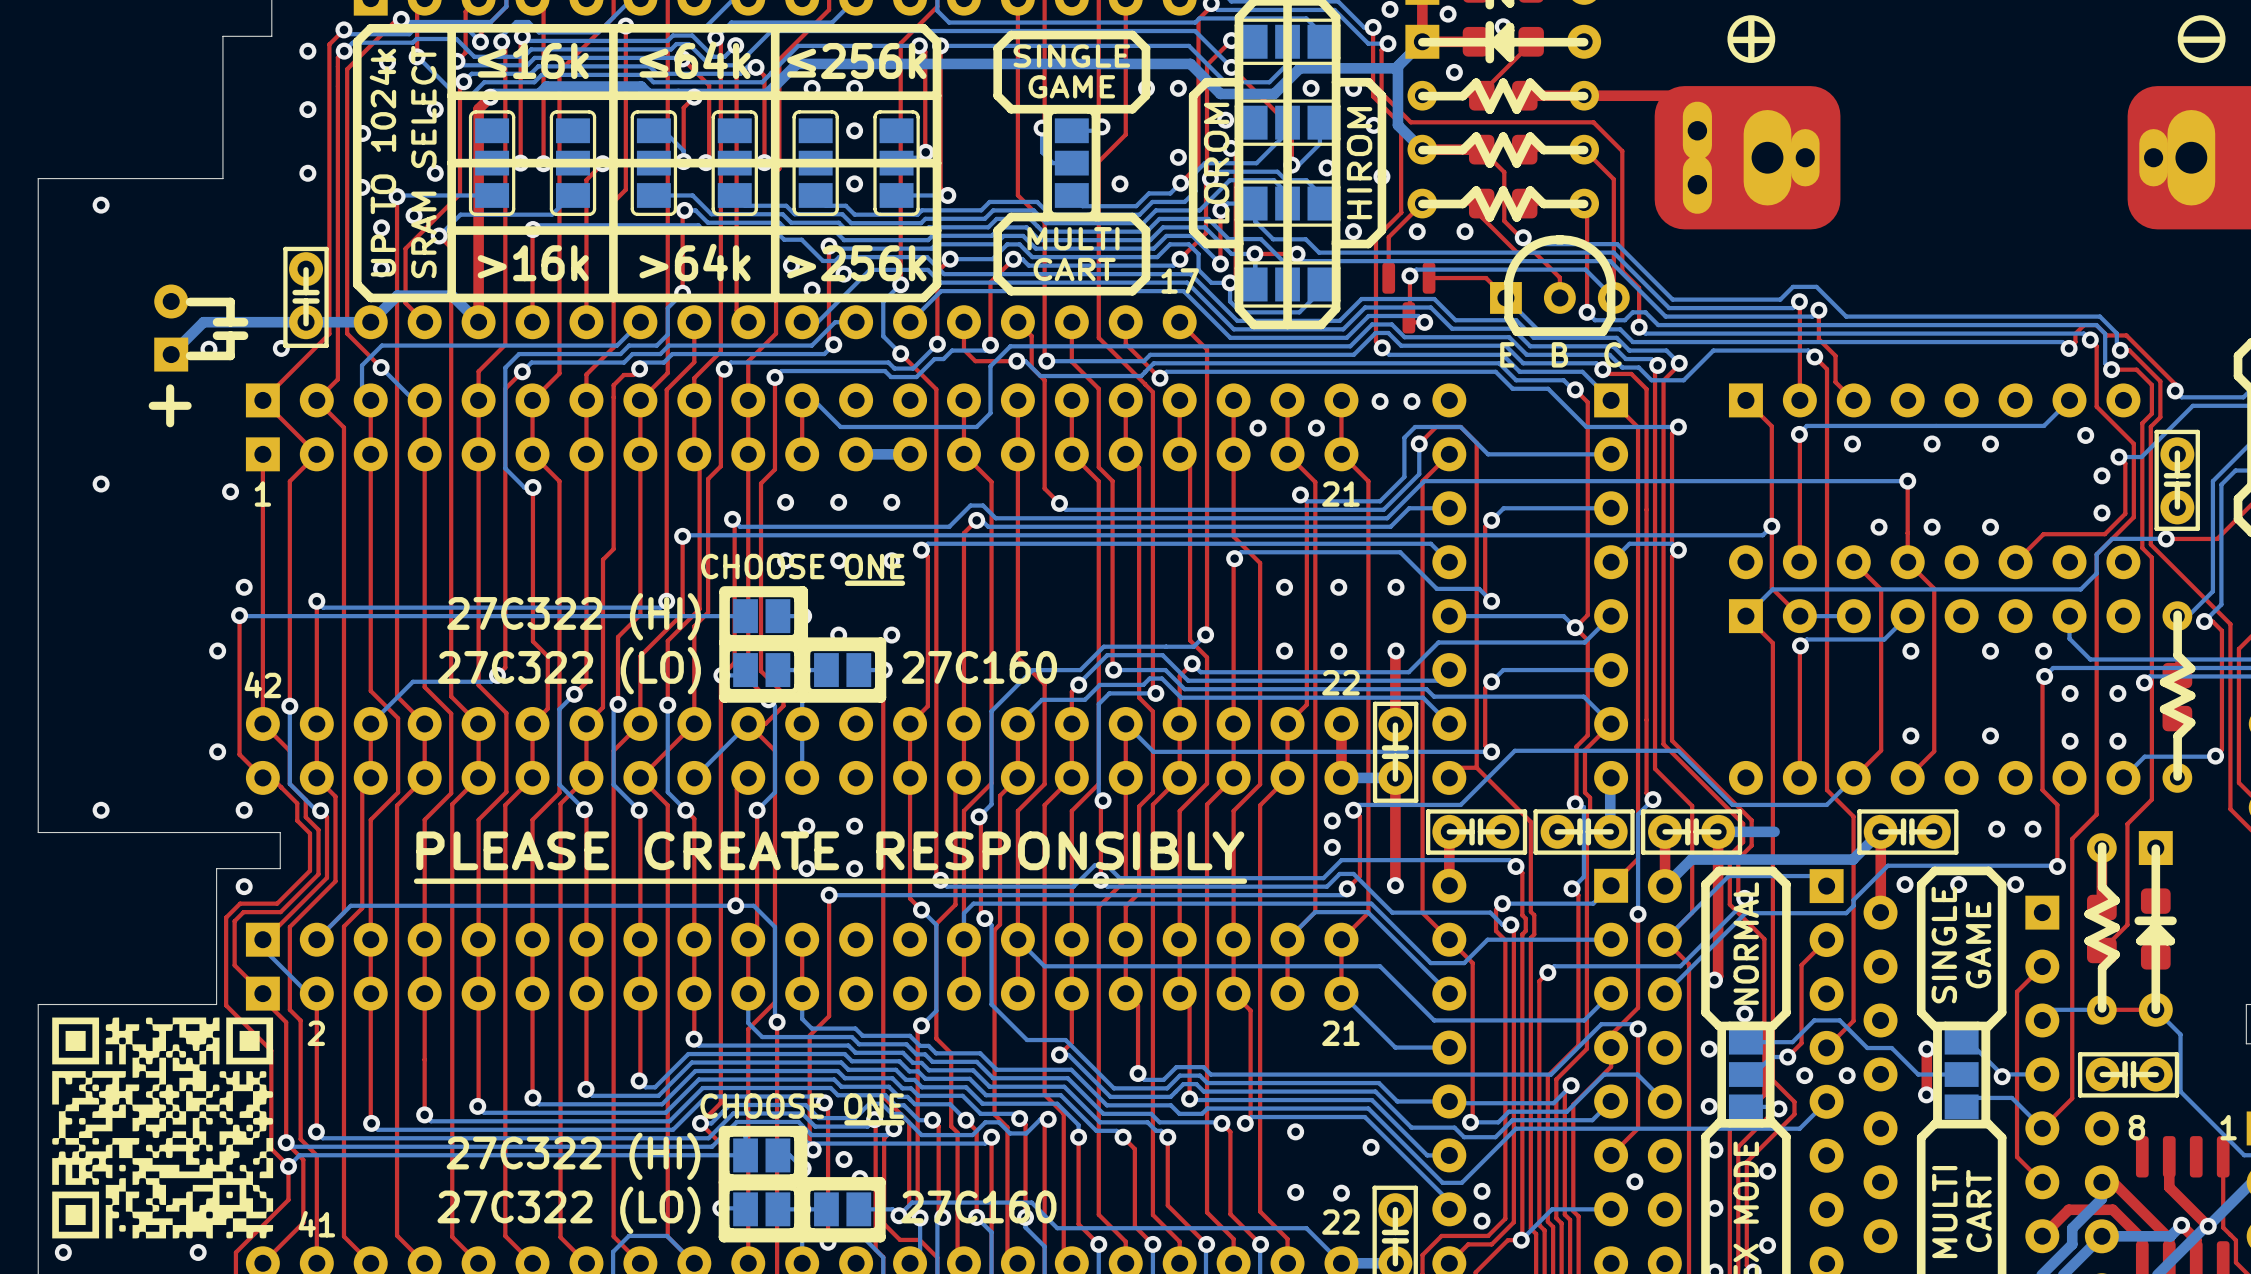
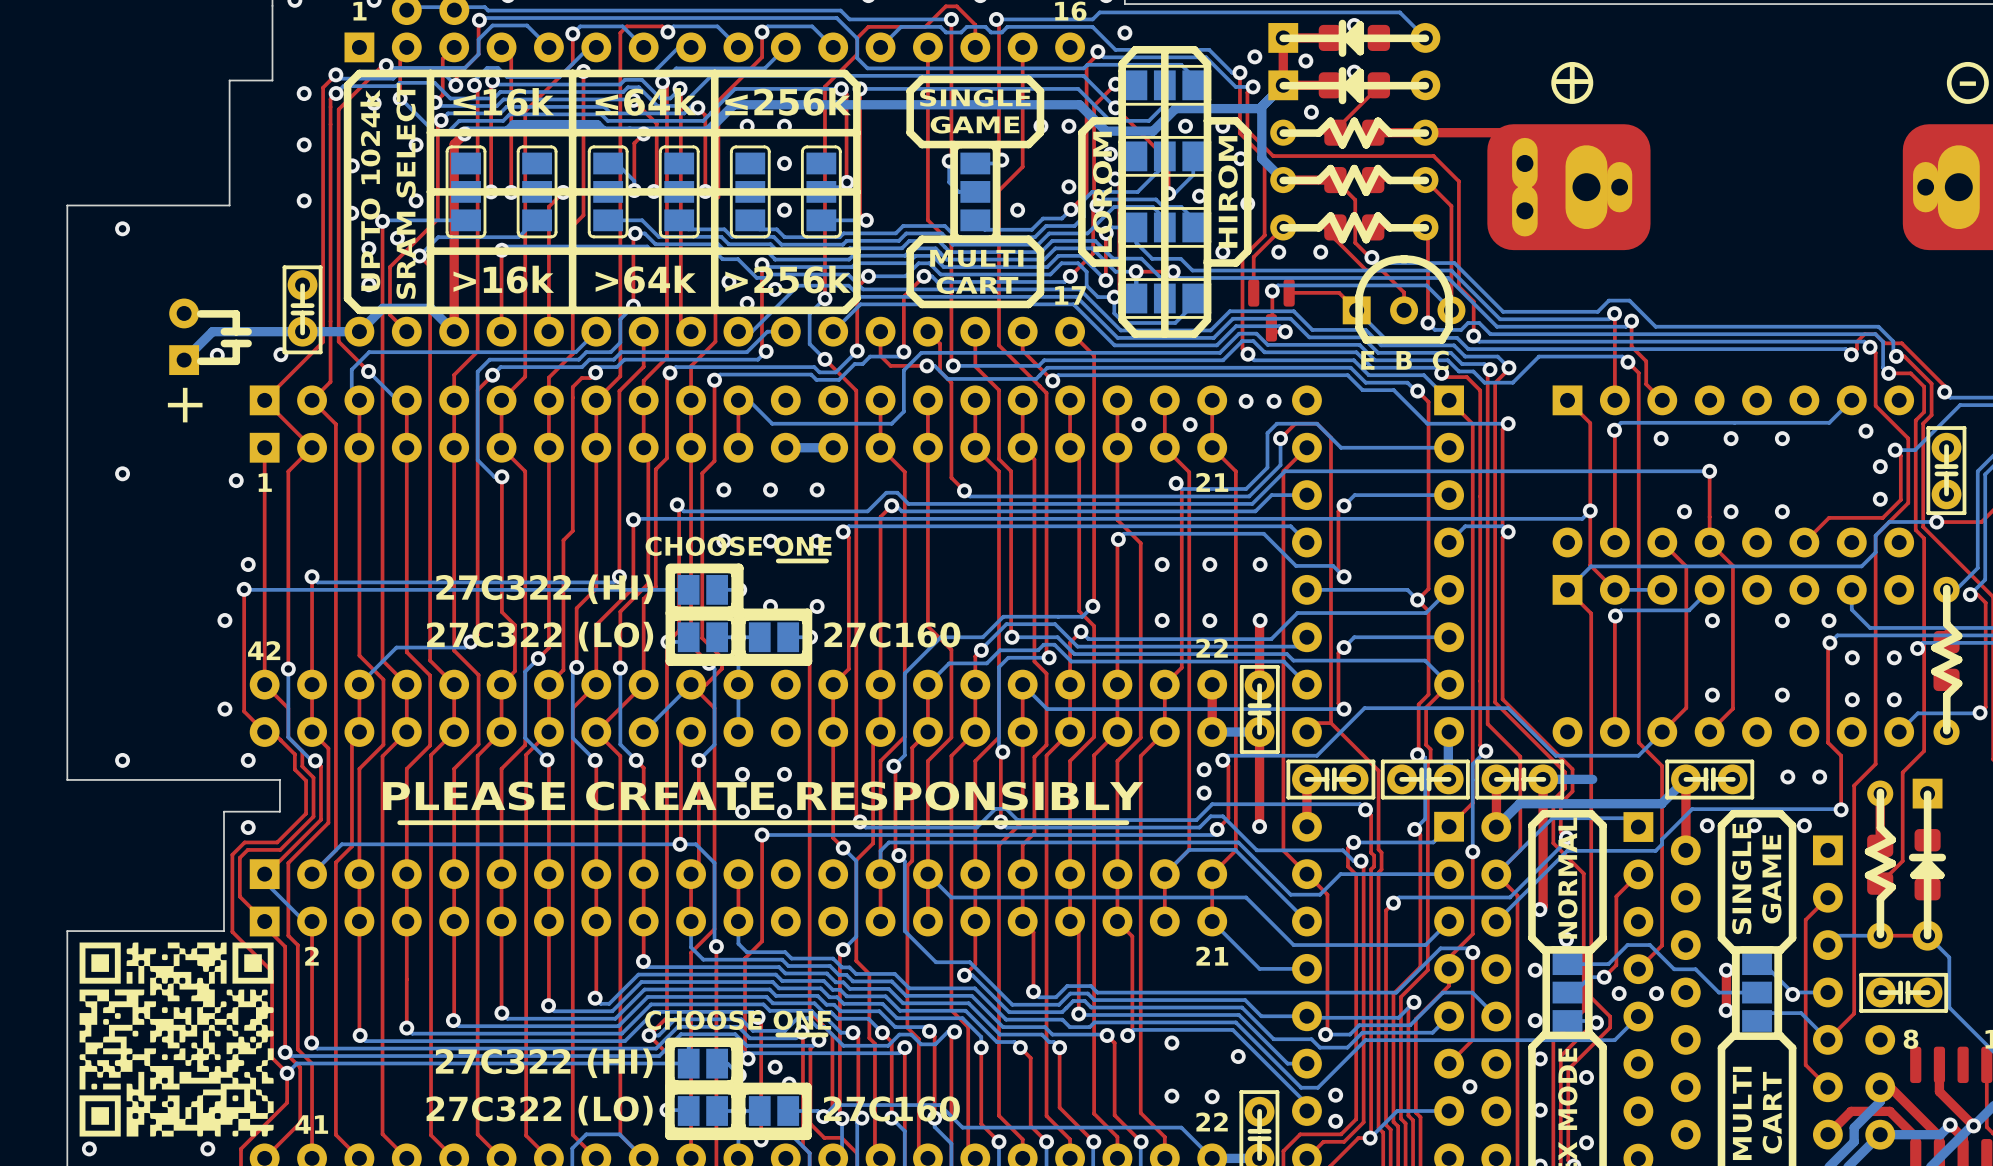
drawing shape: [52, 1017, 274, 1239] -> [79, 942, 274, 1137]

